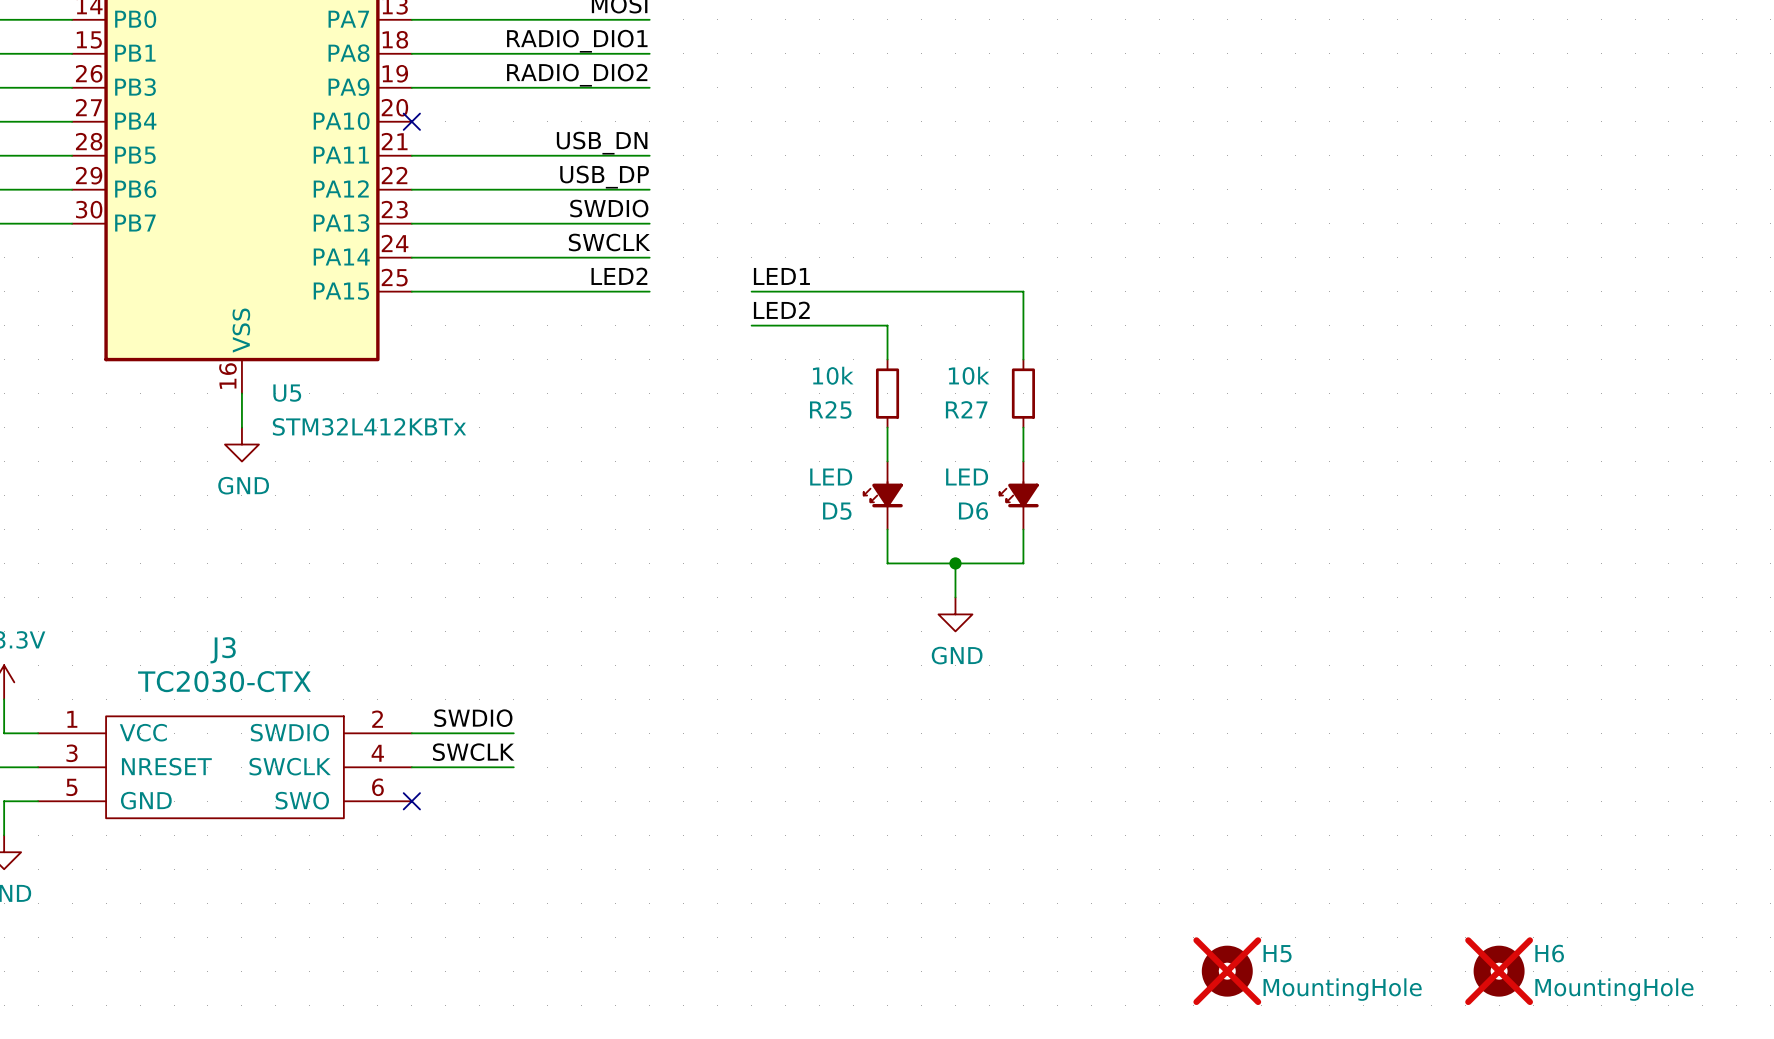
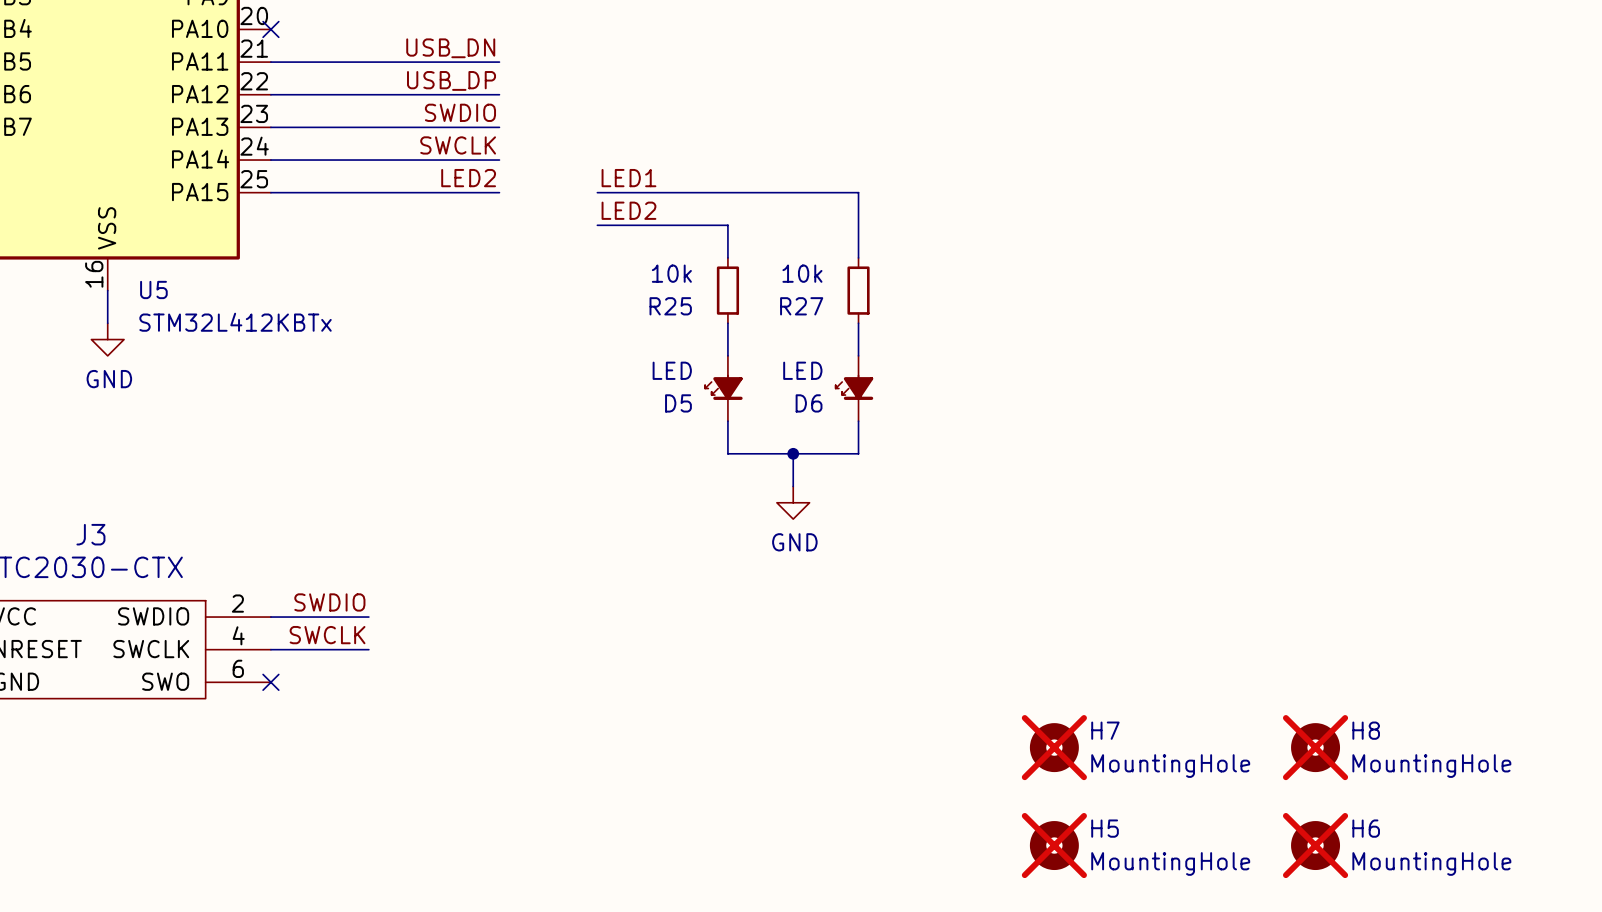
H7: none -> MountingHole (1054, 747)
H8: none -> MountingHole (1315, 747)

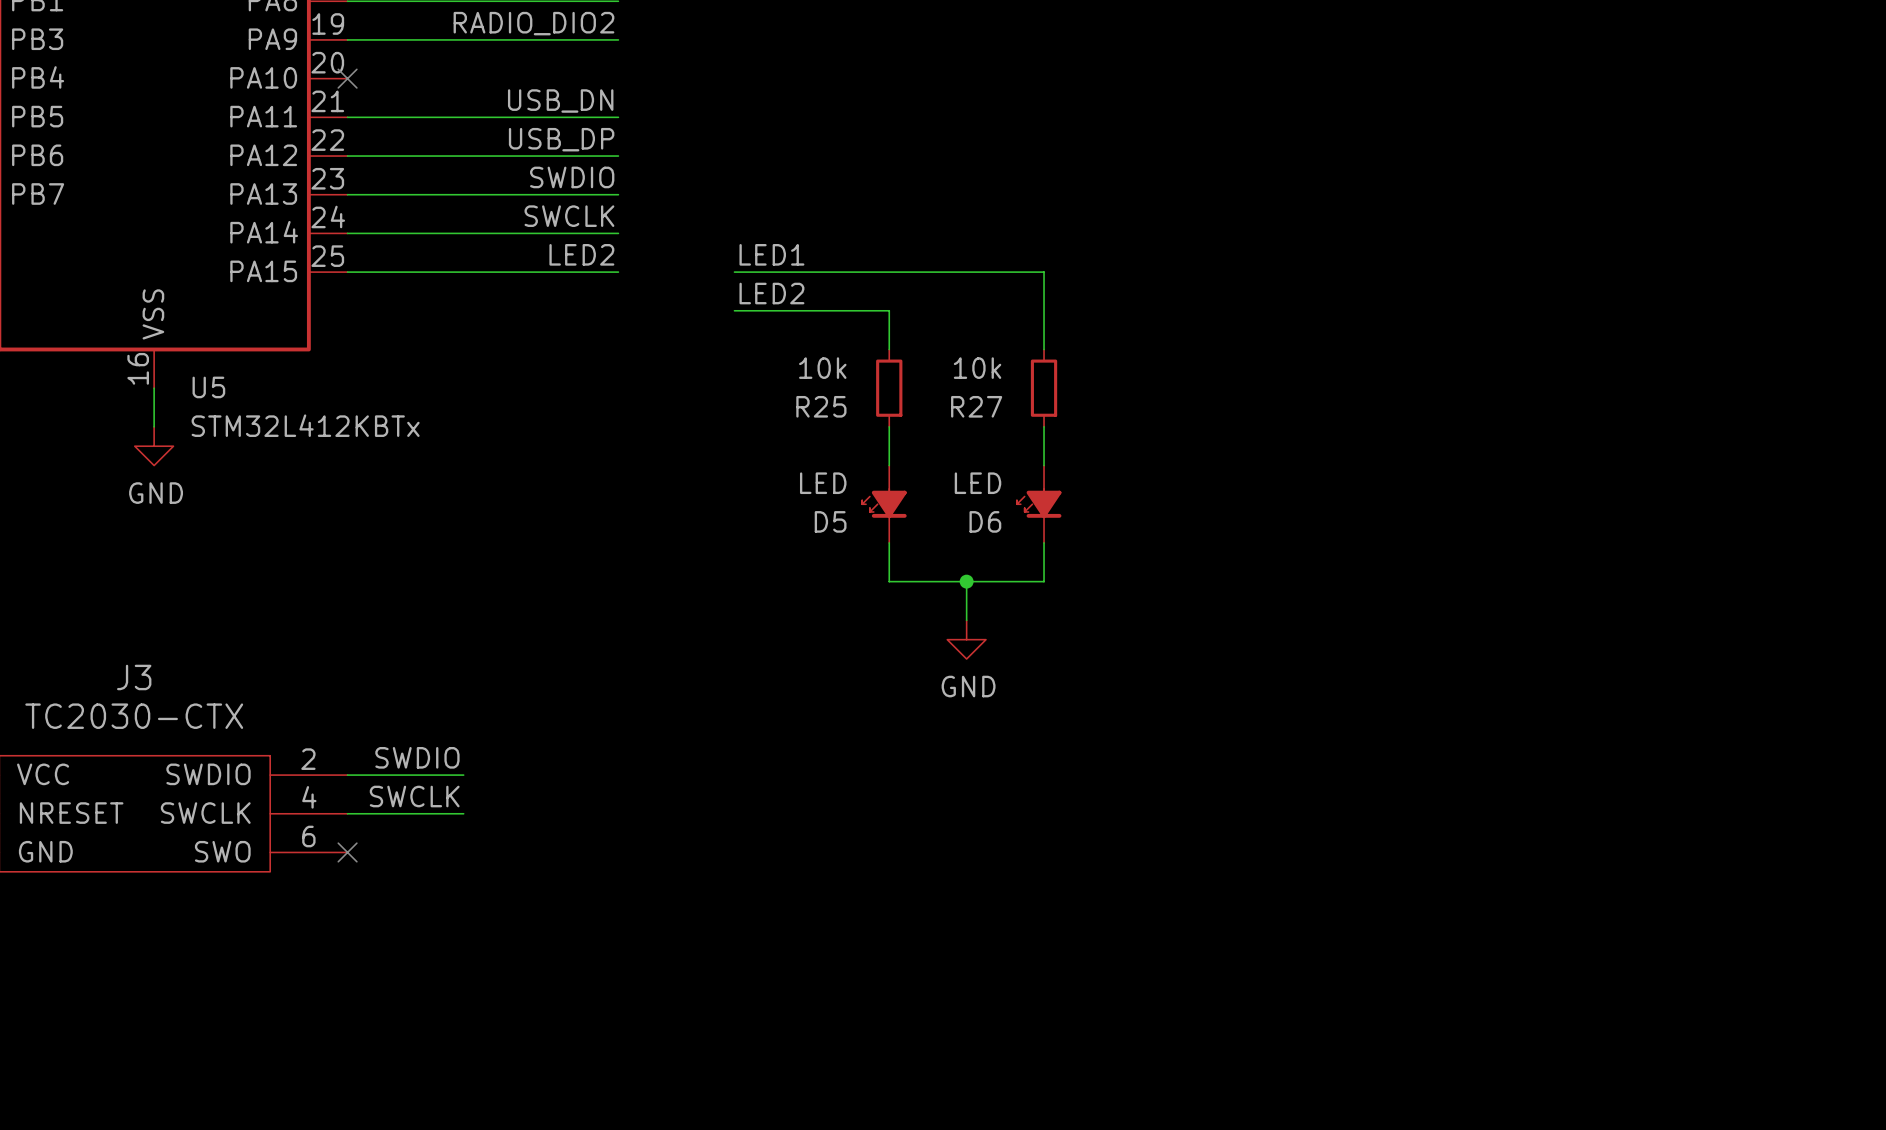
H7: MountingHole (1054, 747) -> none
H8: MountingHole (1315, 747) -> none
H5: MountingHole (1054, 845) -> none
H6: MountingHole (1315, 845) -> none

